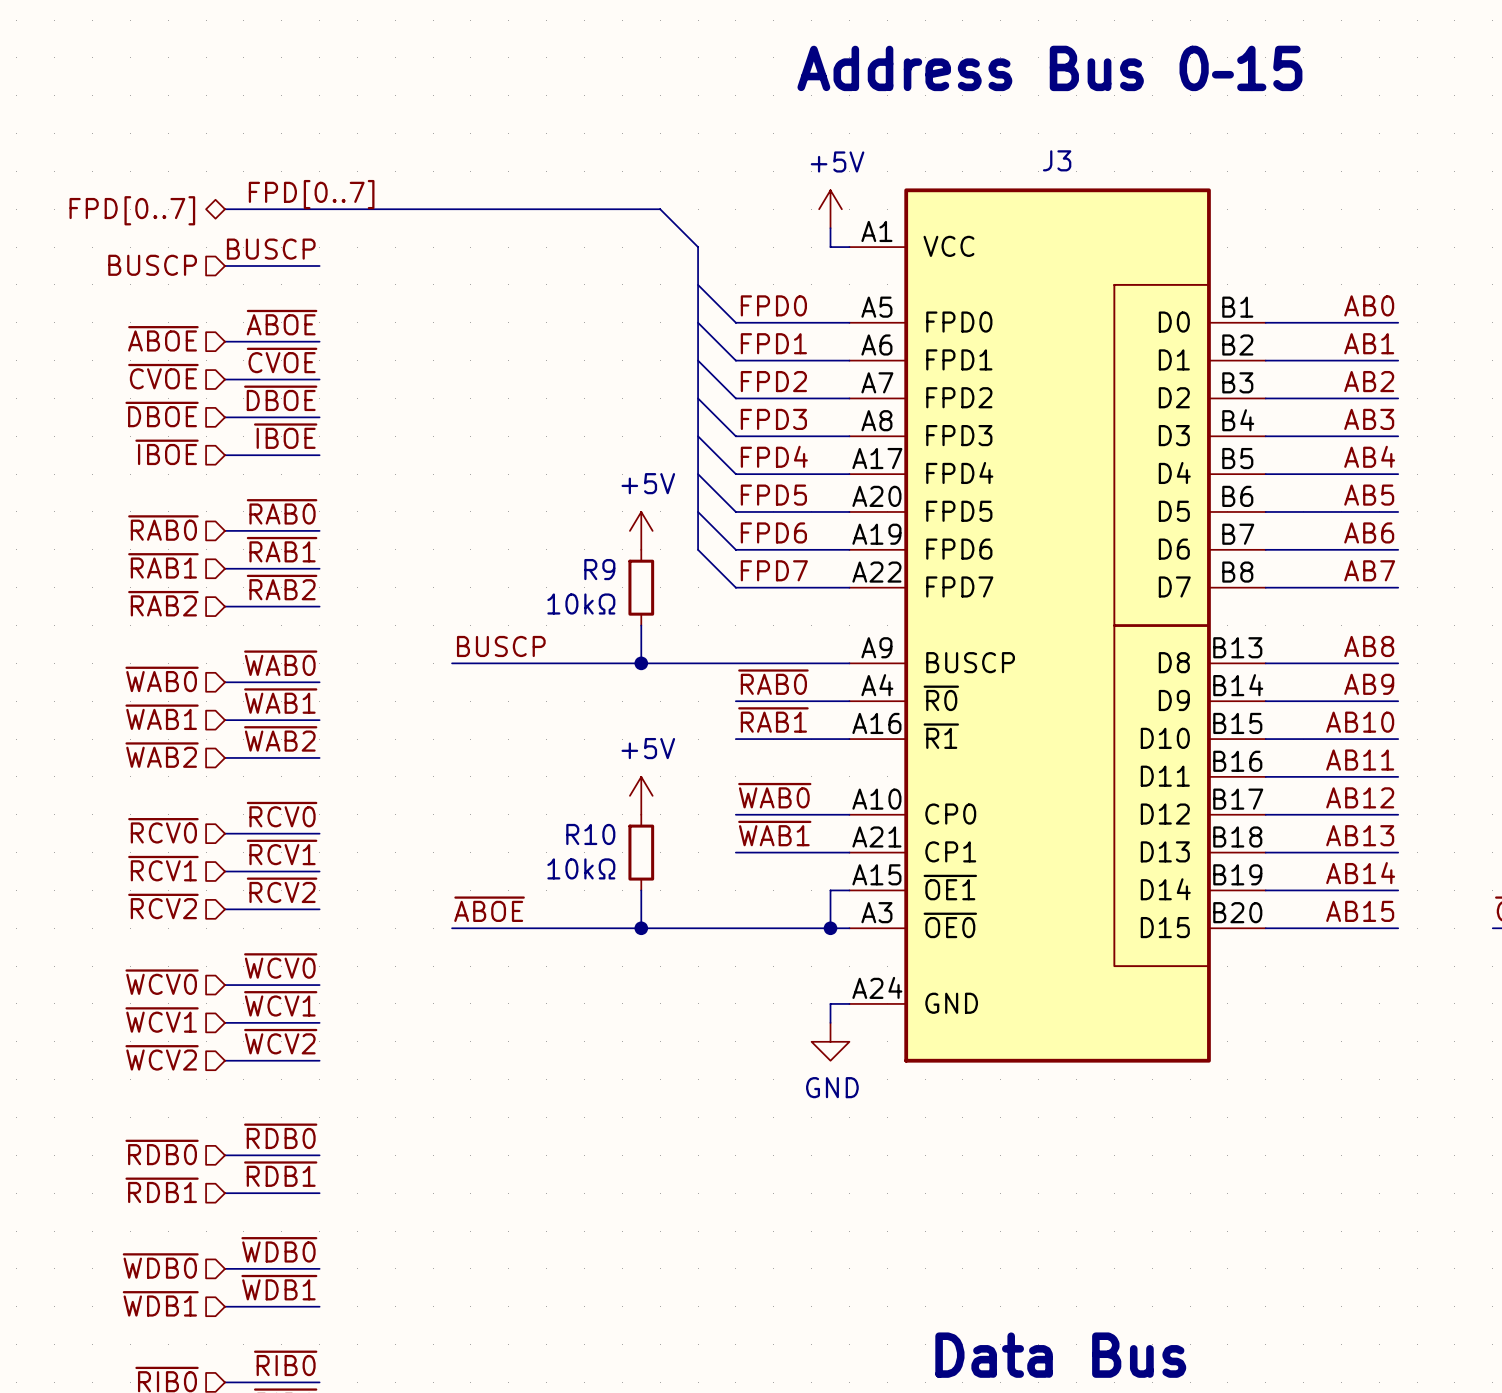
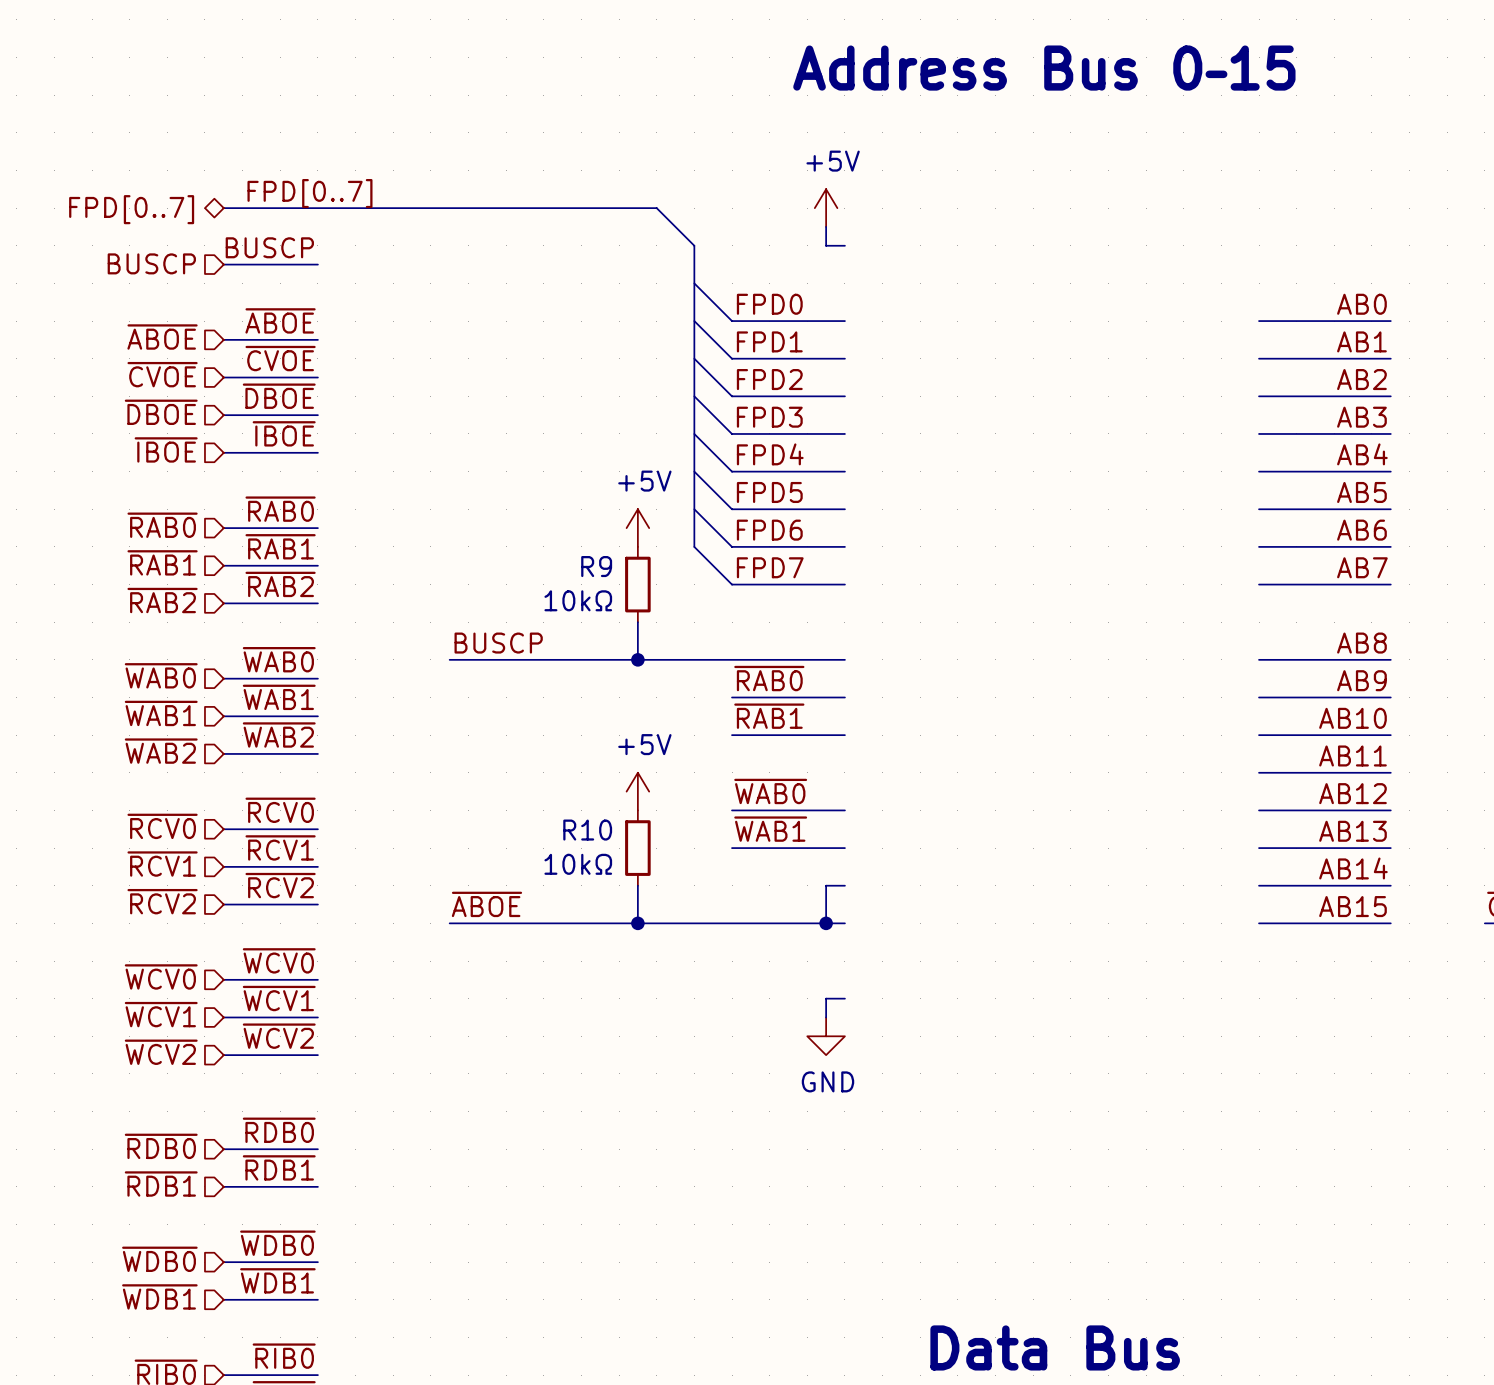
J3: (1057, 625) -> none

